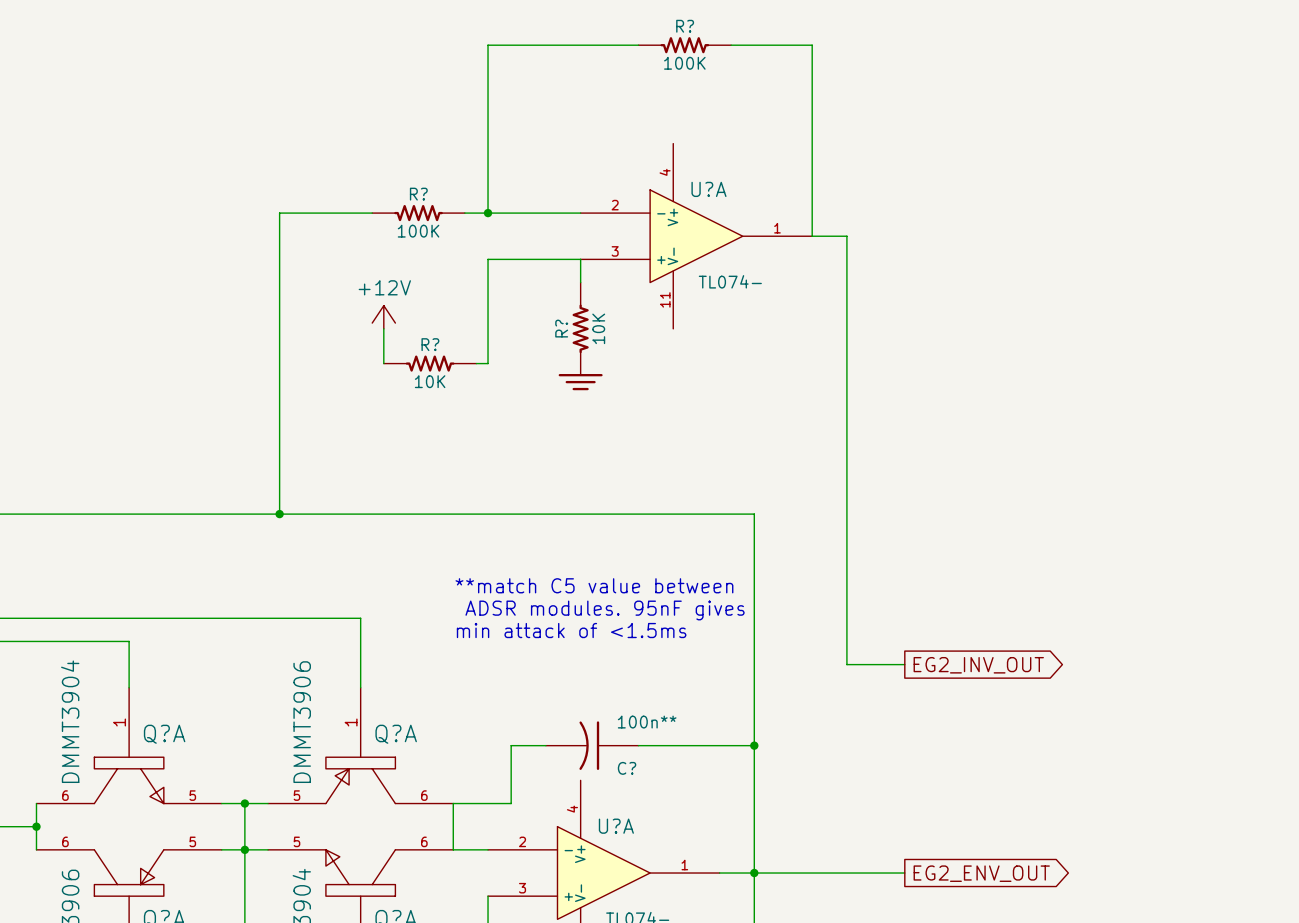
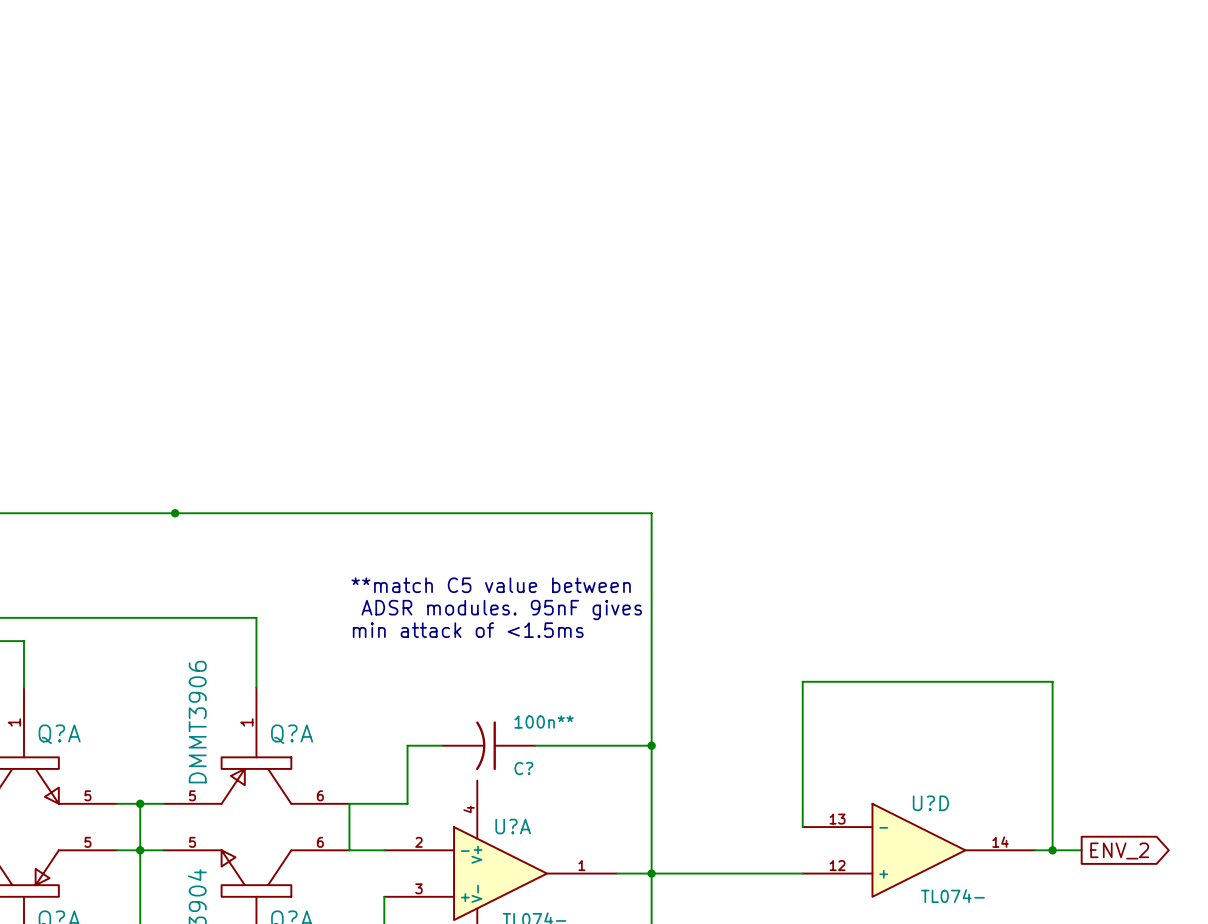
wire: (638, 45) (488, 45) (488, 213) -> none
R?: 100K (684, 45) -> none
wire: (731, 45) (812, 45) (812, 236) (846, 236) (846, 664) (904, 664) -> none
wire: (372, 213) (279, 213) (279, 514) -> none
R?: 100K (418, 213) -> none
wire: (464, 213) (580, 213) -> none
junction: (488, 213) -> none
U?A: TL074- (696, 236) -> none
wire: (580, 282) (580, 259) (488, 259) (488, 363) (476, 363) -> none
power symbol: +12V (383, 317) -> none
wire: (383, 328) (383, 363) -> none
R?: 10K (580, 328) -> none
R?: 10K (430, 363) -> none
power symbol: (580, 382) -> none
global label: EG2_INV_OUT (978, 665) -> none
wire: none -> (802, 827) (802, 681) (1052, 681) (1052, 850)
U?D: none -> TL074- (918, 850)
wire: none -> (1035, 850) (1081, 850)
junction: none -> (1052, 850)
global label: none -> ENV_2 (1119, 850)
global label: EG2_ENV_OUT (981, 873) -> none

